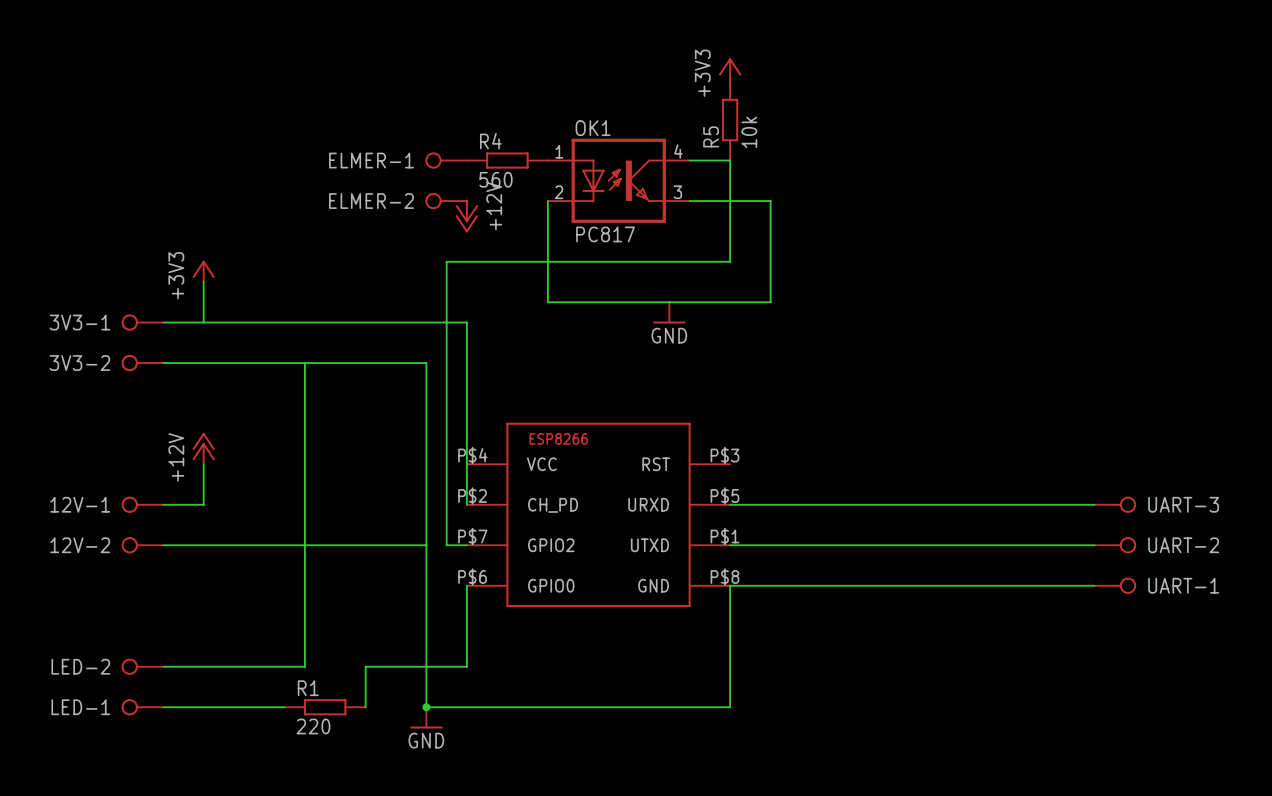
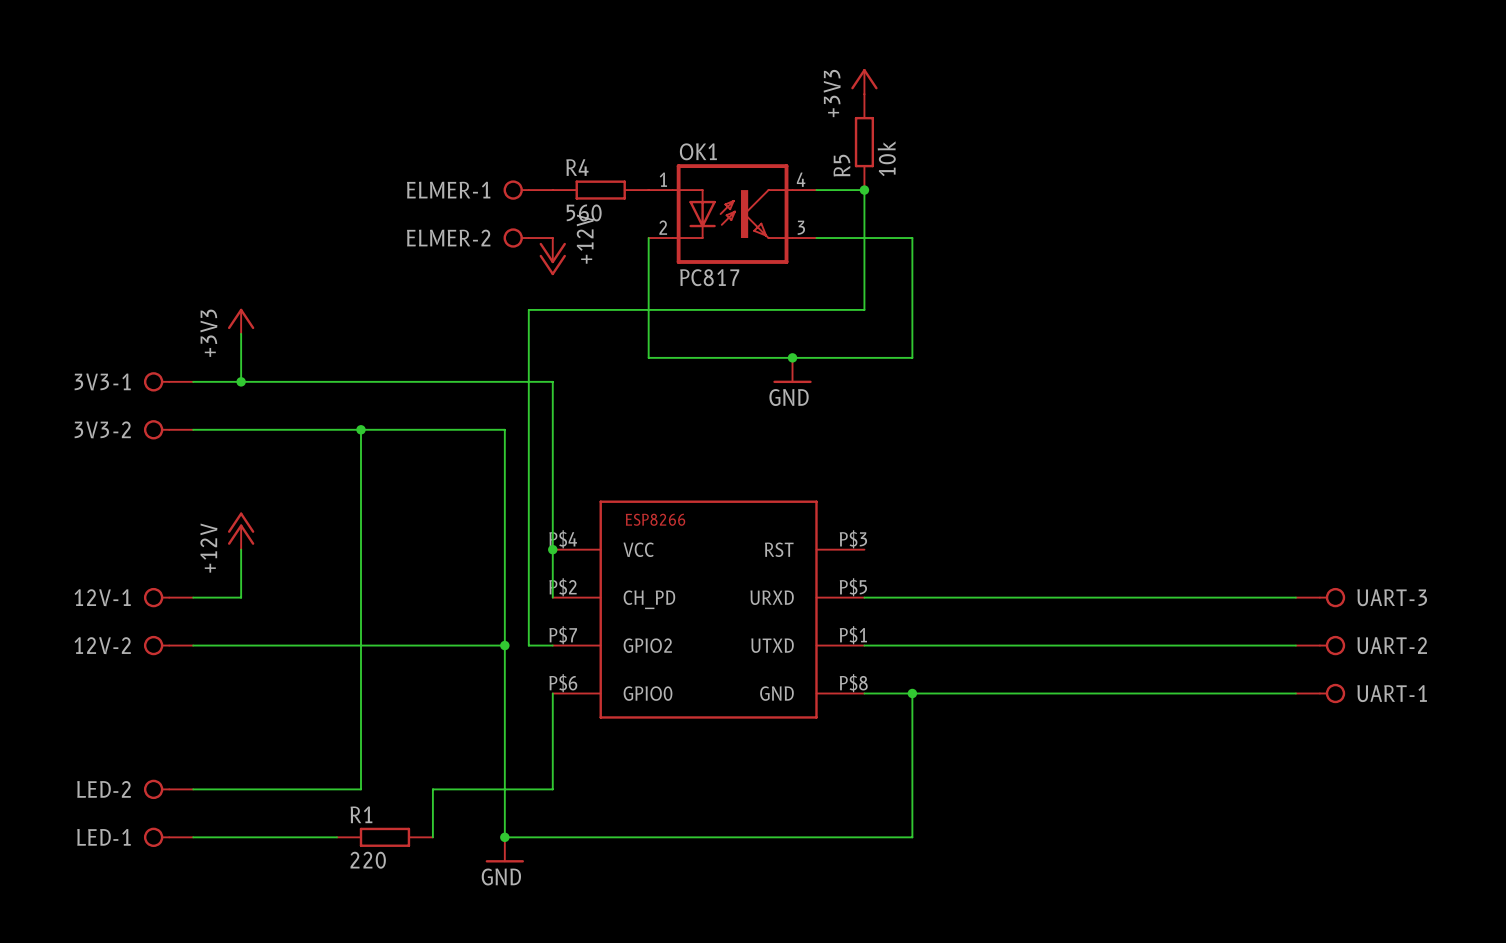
junction: none -> (864, 190)
junction: none -> (792, 357)
junction: none -> (241, 381)
junction: none -> (360, 429)
junction: none -> (552, 549)
junction: none -> (504, 645)
wire: (730, 585) (730, 707) -> (912, 693) (912, 837) (864, 837)
junction: none -> (912, 693)

